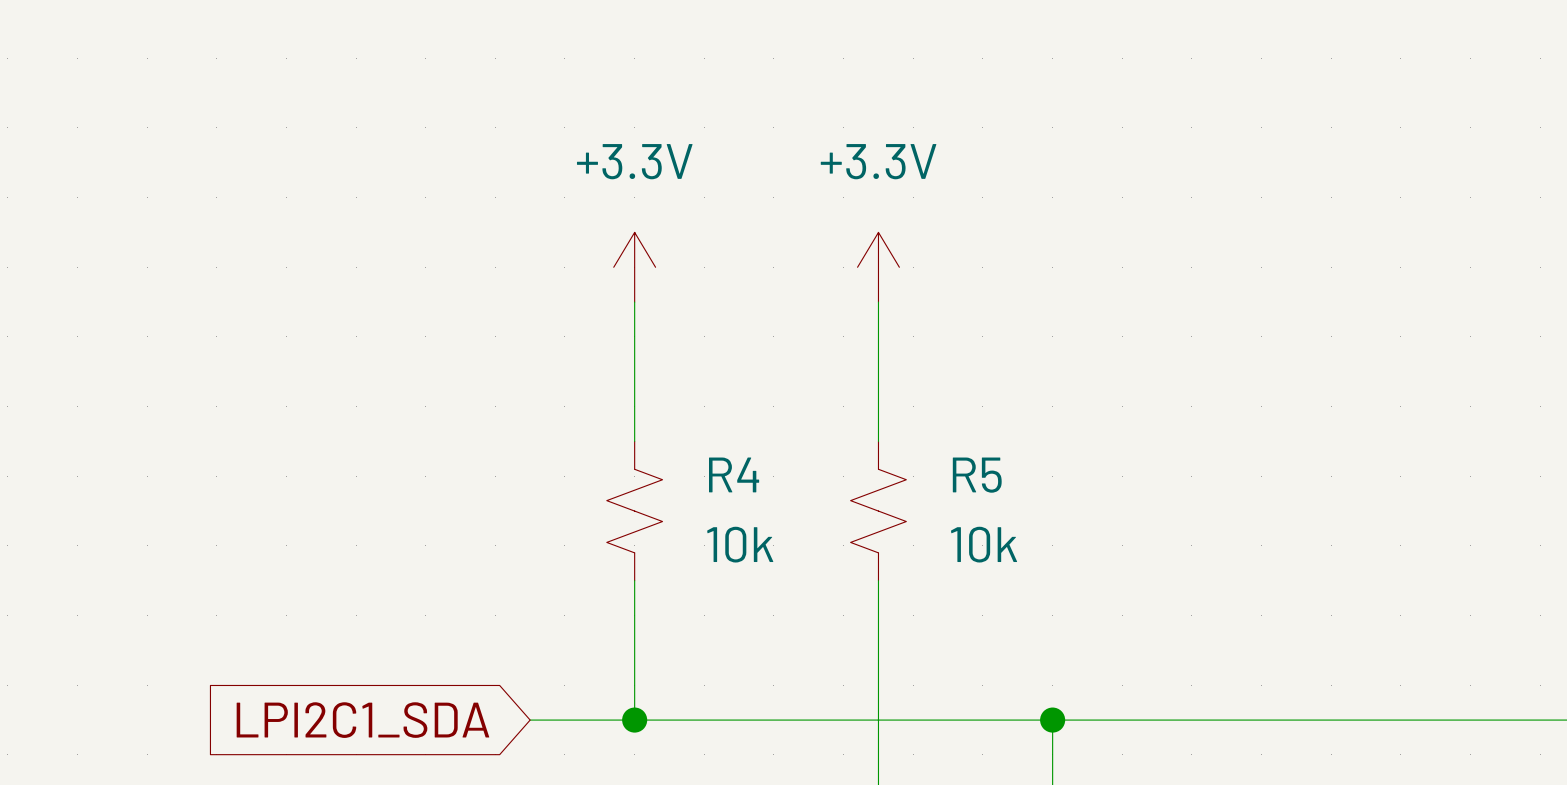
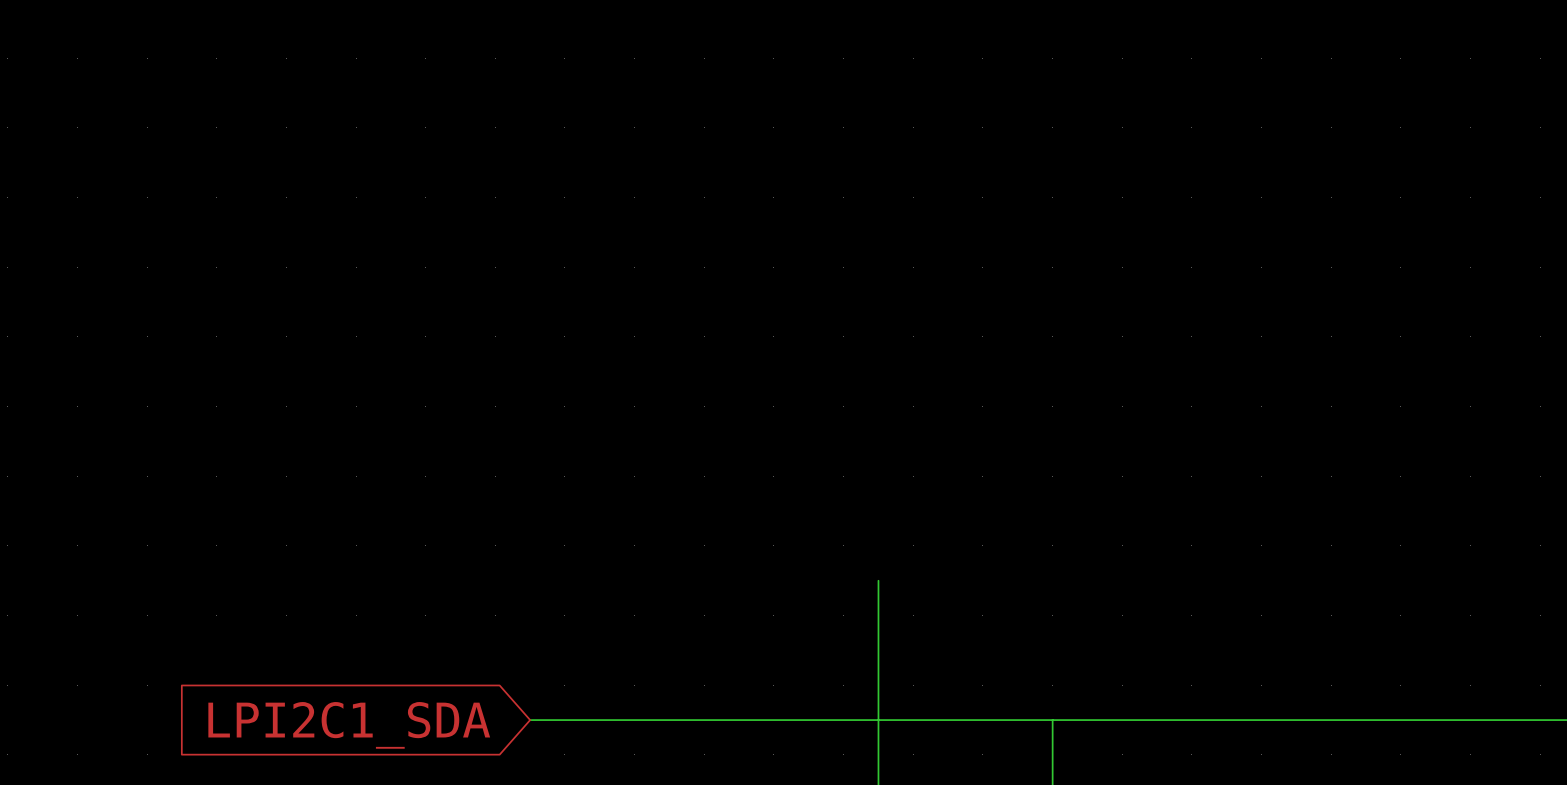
power symbol: +3.3V (634, 267) -> none
power symbol: +3.3V (878, 267) -> none
wire: (634, 302) (634, 441) -> none
wire: (878, 302) (878, 441) -> none
R4: 10k (634, 511) -> none
R5: 10k (878, 511) -> none
wire: (634, 580) (634, 720) -> none
junction: (634, 720) -> none
junction: (1052, 720) -> none

